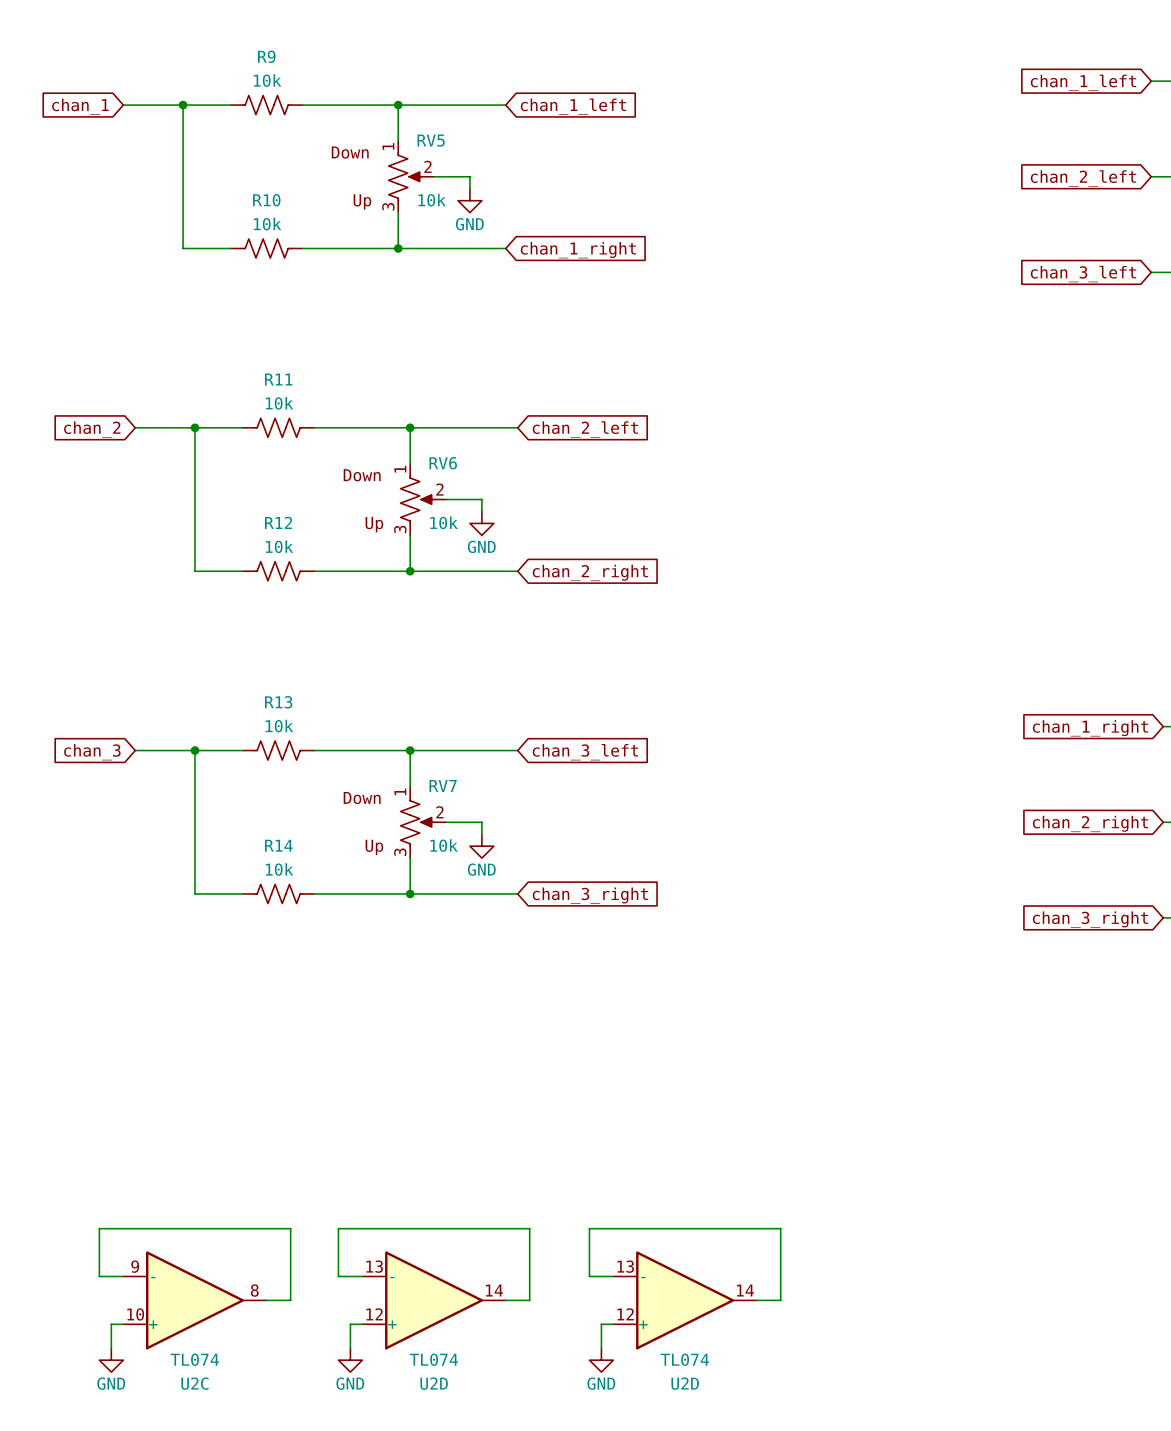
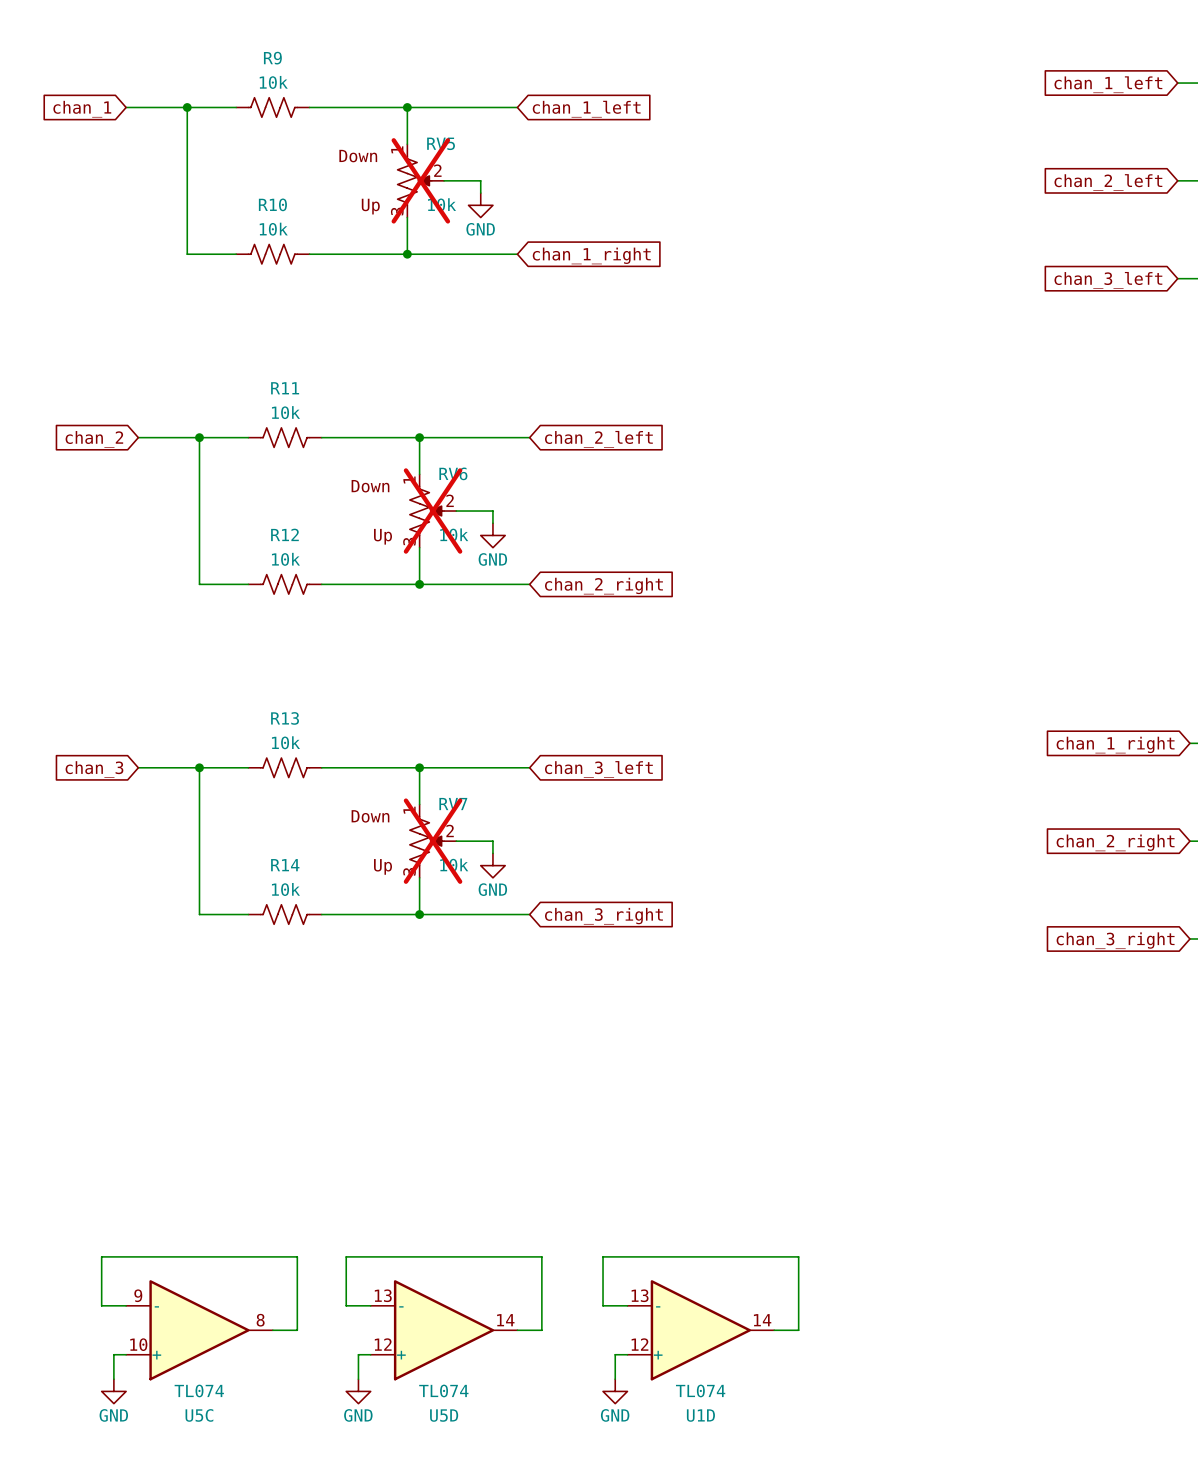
RV5 do-not-place cross: none -> (420, 180)
RV6 do-not-place cross: none -> (433, 511)
RV7 do-not-place cross: none -> (433, 841)
U2C name: U2C (194, 1383) -> U5C (199, 1415)
U2D name: U2D (434, 1383) -> U5D (444, 1415)
U2D name: U2D (685, 1383) -> U1D (700, 1415)

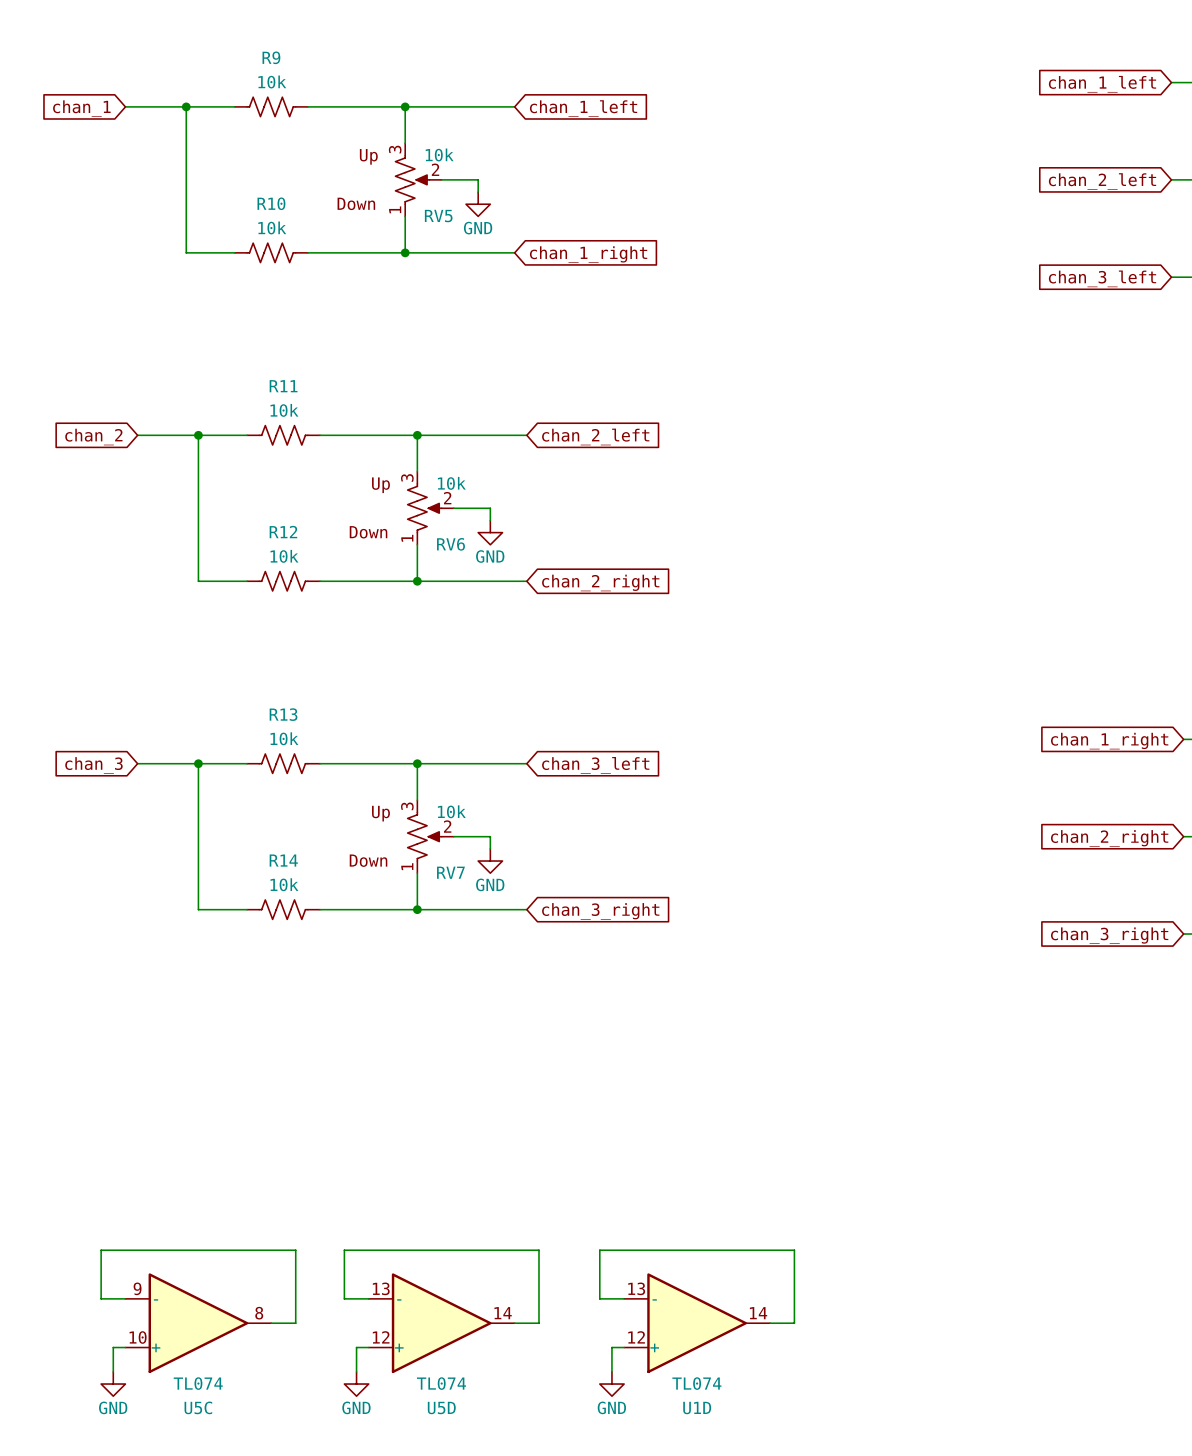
RV5 flip: as is (414, 180) -> up-down (412, 179)
RV5 do-not-place cross: (420, 180) -> none
RV6 flip: as is (426, 511) -> up-down (424, 508)
RV6 do-not-place cross: (433, 511) -> none
RV7 flip: as is (426, 841) -> up-down (424, 836)
RV7 do-not-place cross: (433, 841) -> none

